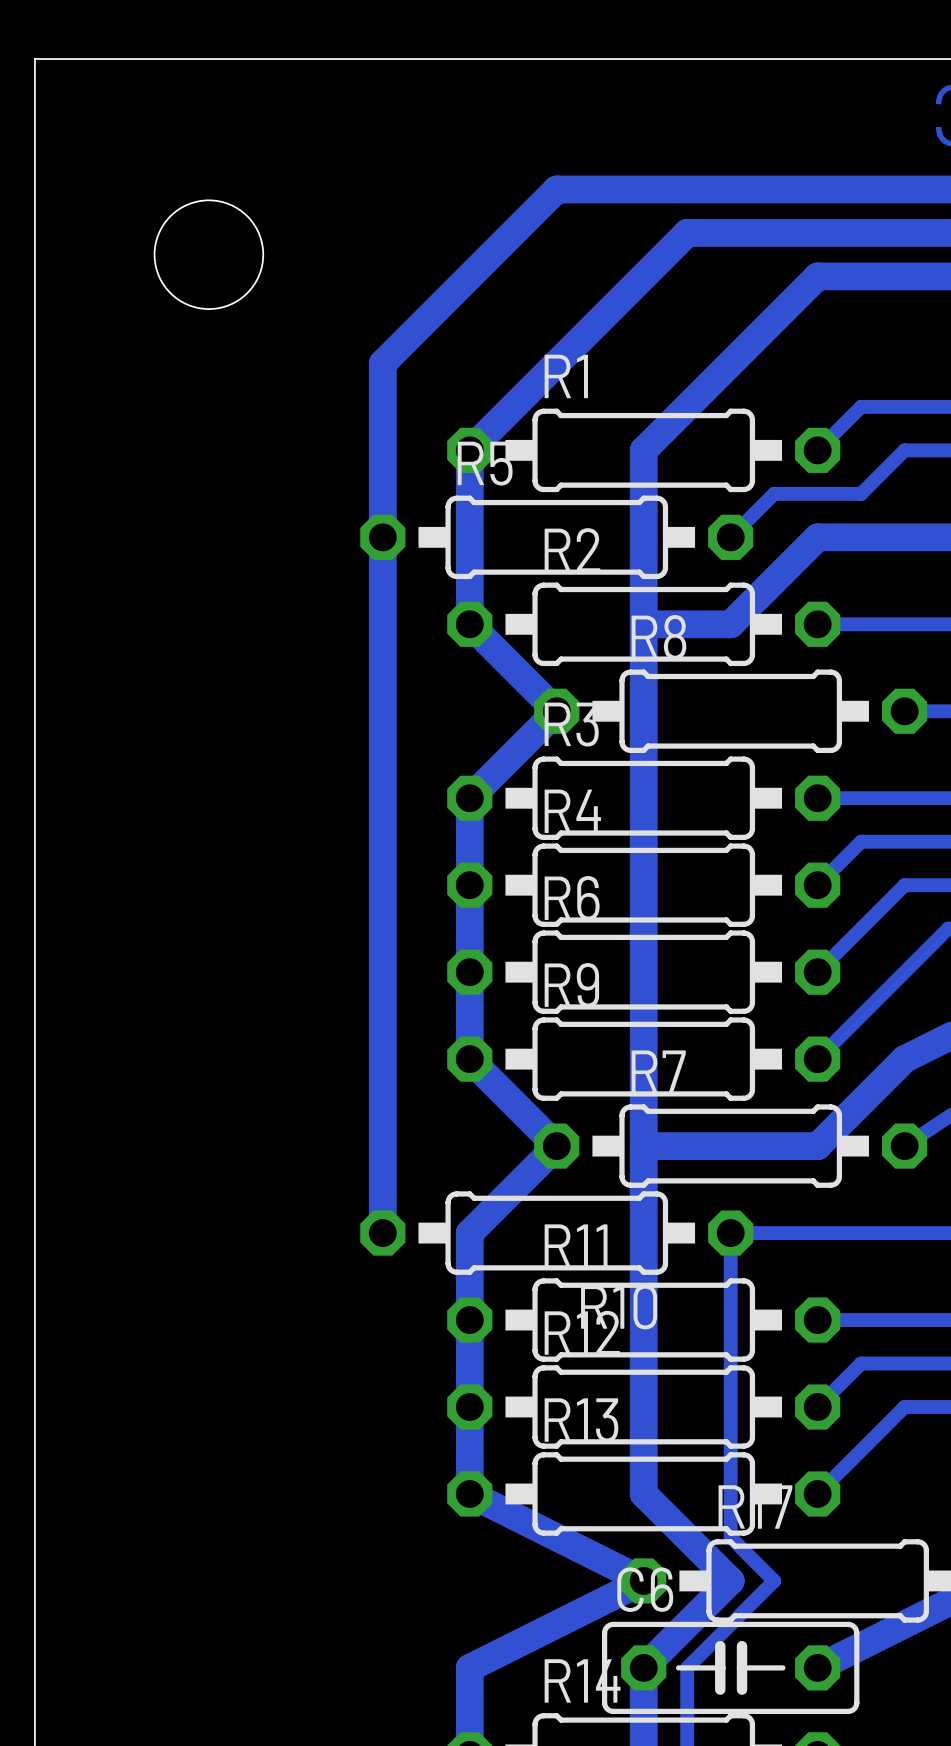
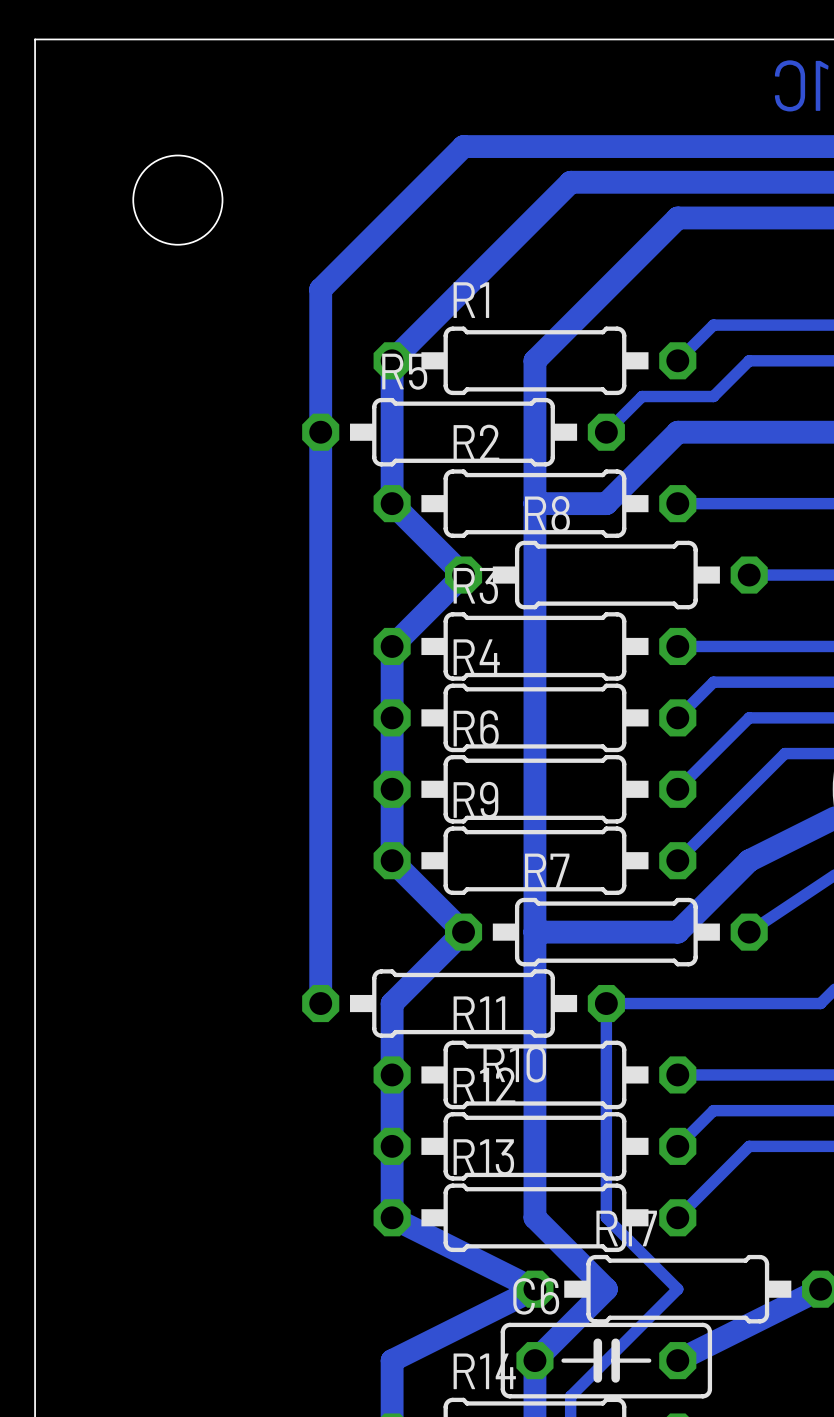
bottom track: (730, 1493) (730, 1537) (774, 1580) (687, 1667) (687, 1711) -> (606, 1217) (677, 1289) (570, 1396)

